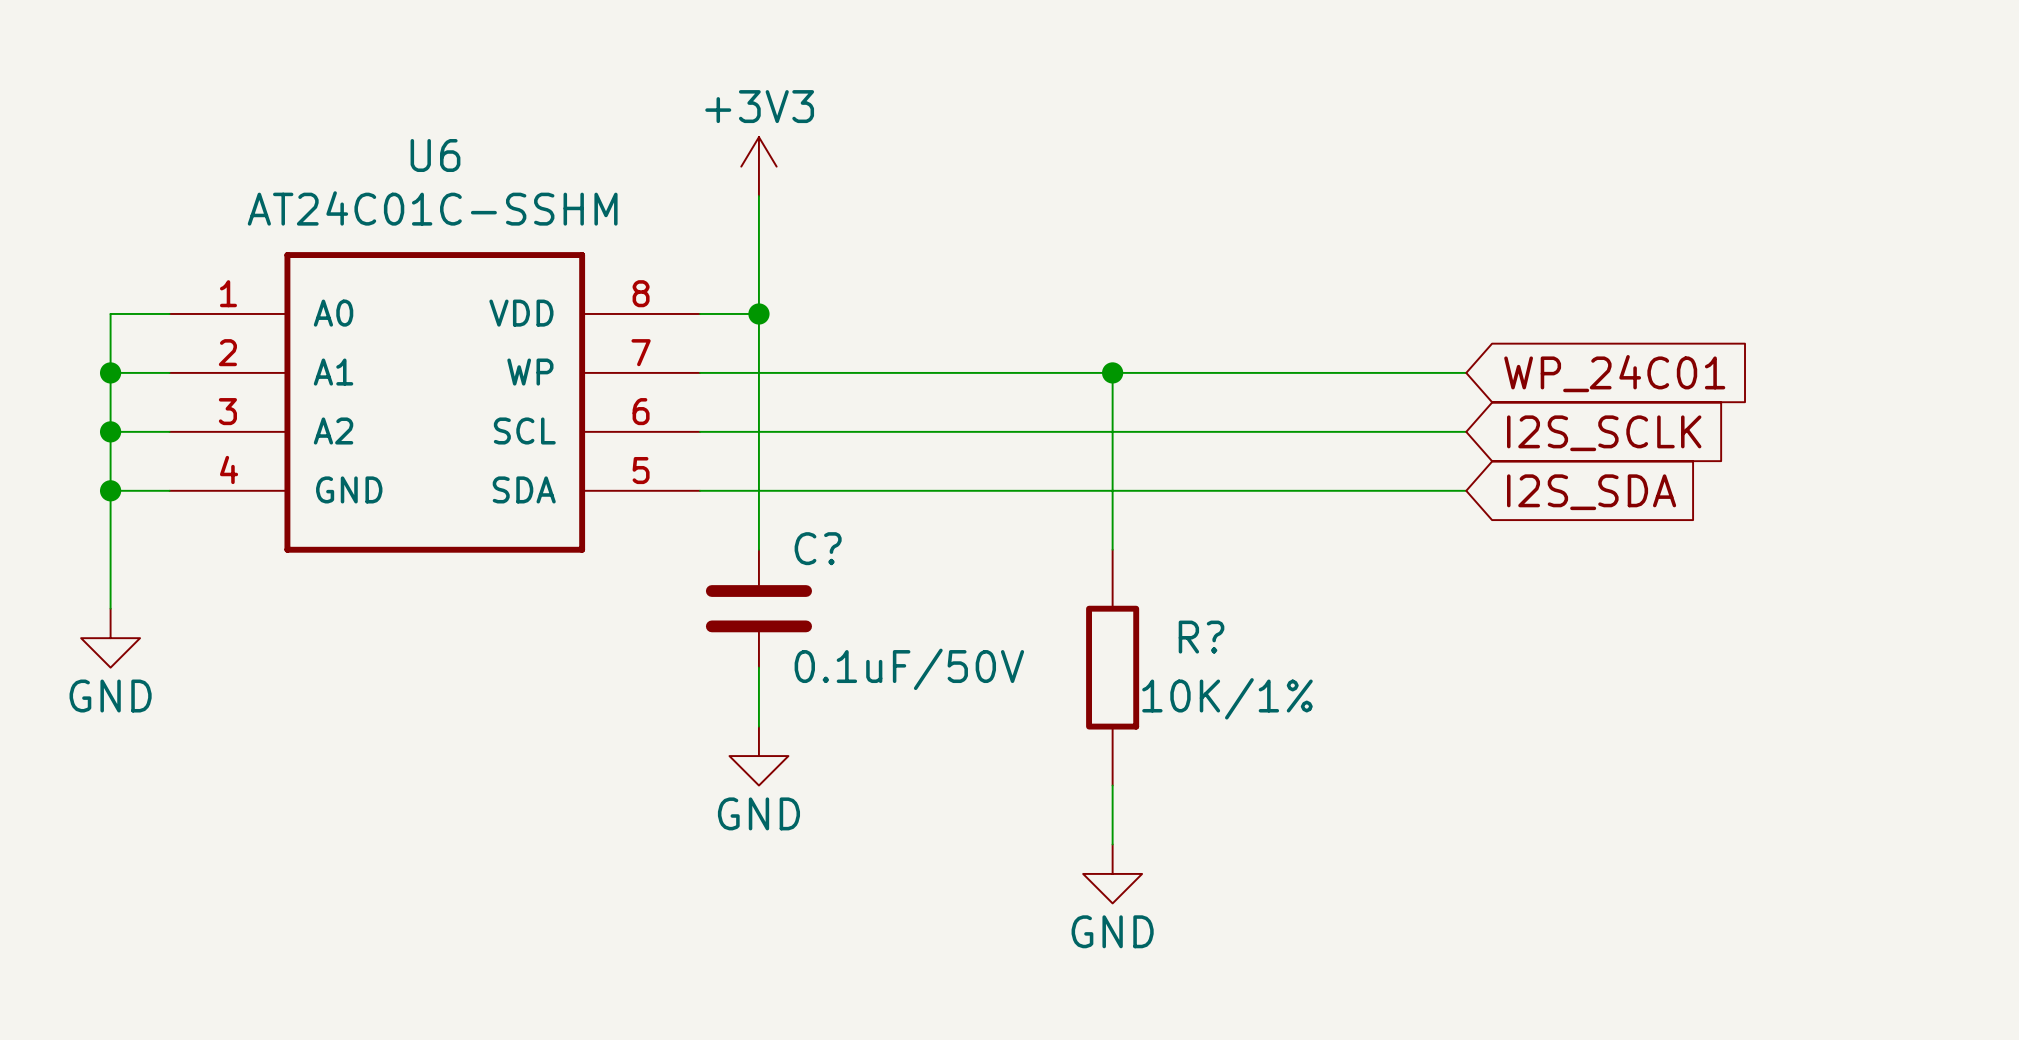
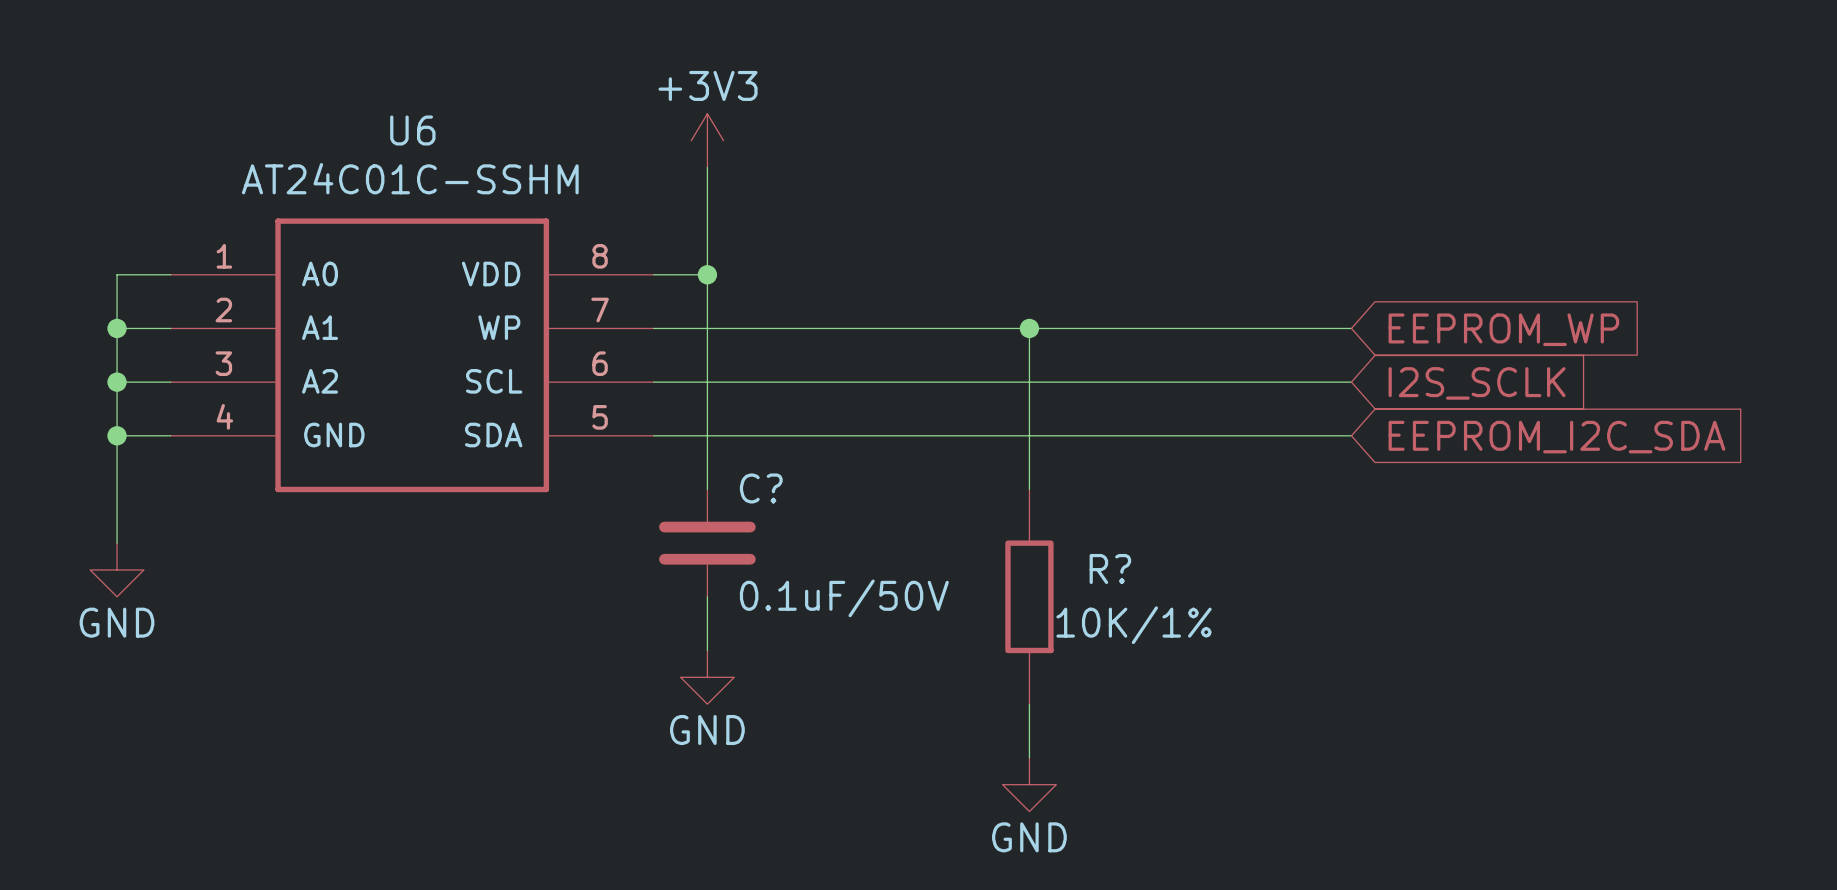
global label: WP_24C01 (1614, 373) -> EEPROM_WP (1503, 329)
global label: I2S_SDA (1591, 492) -> EEPROM_I2C_SDA (1556, 437)

